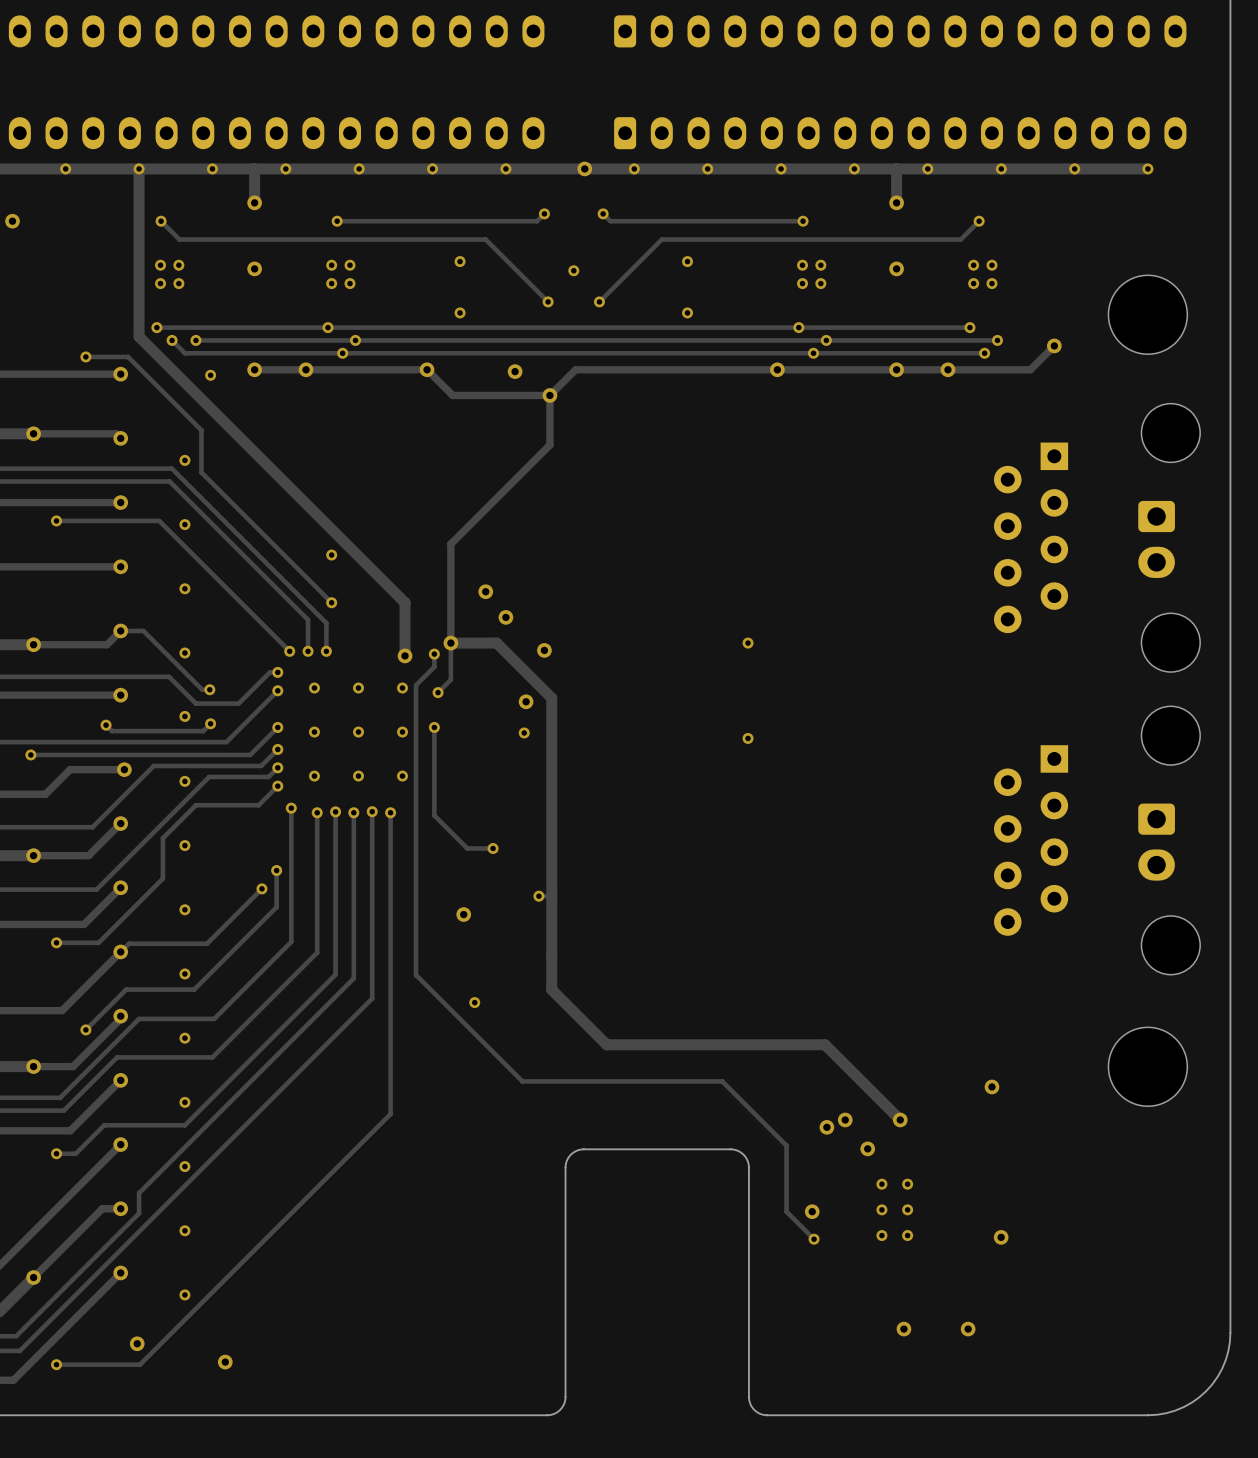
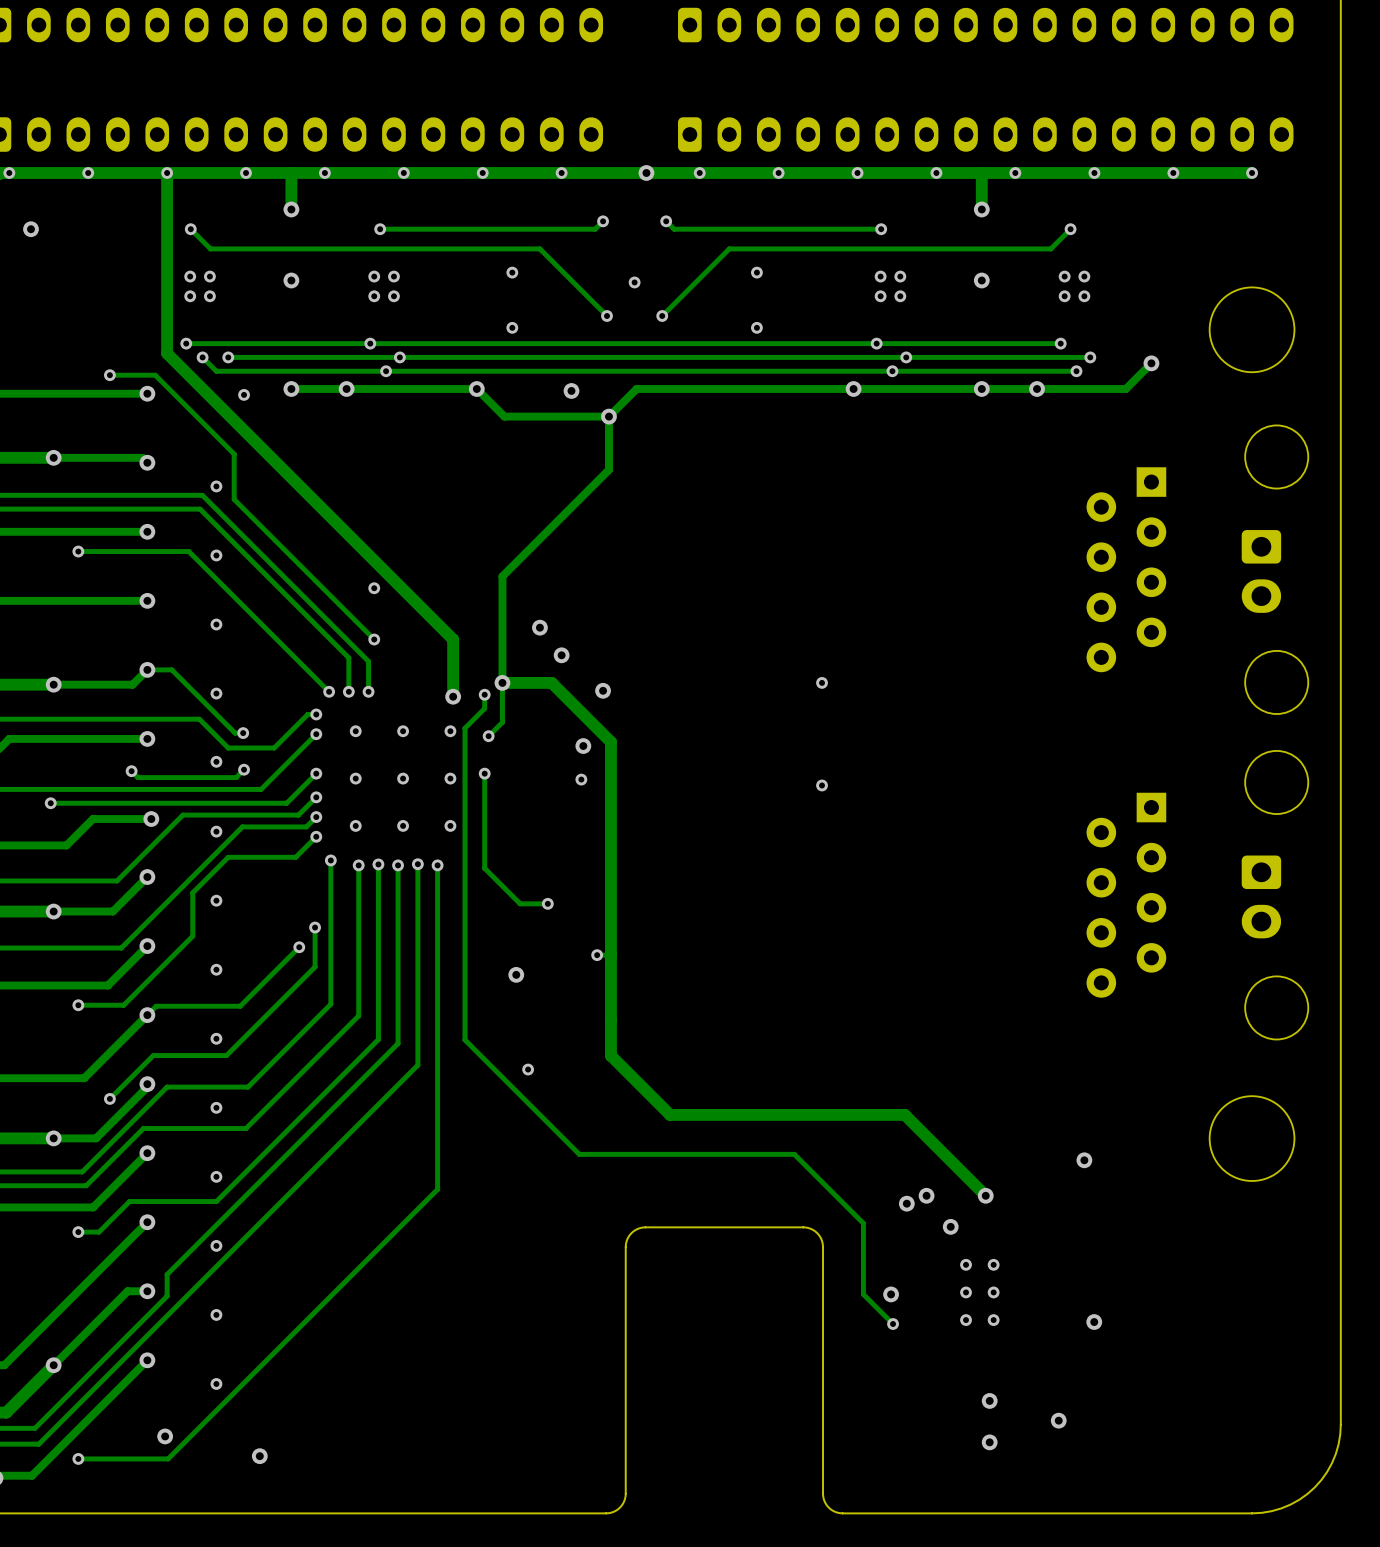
via: none -> (989, 1400)
via: (903, 1329) -> none
via: none -> (989, 1442)

